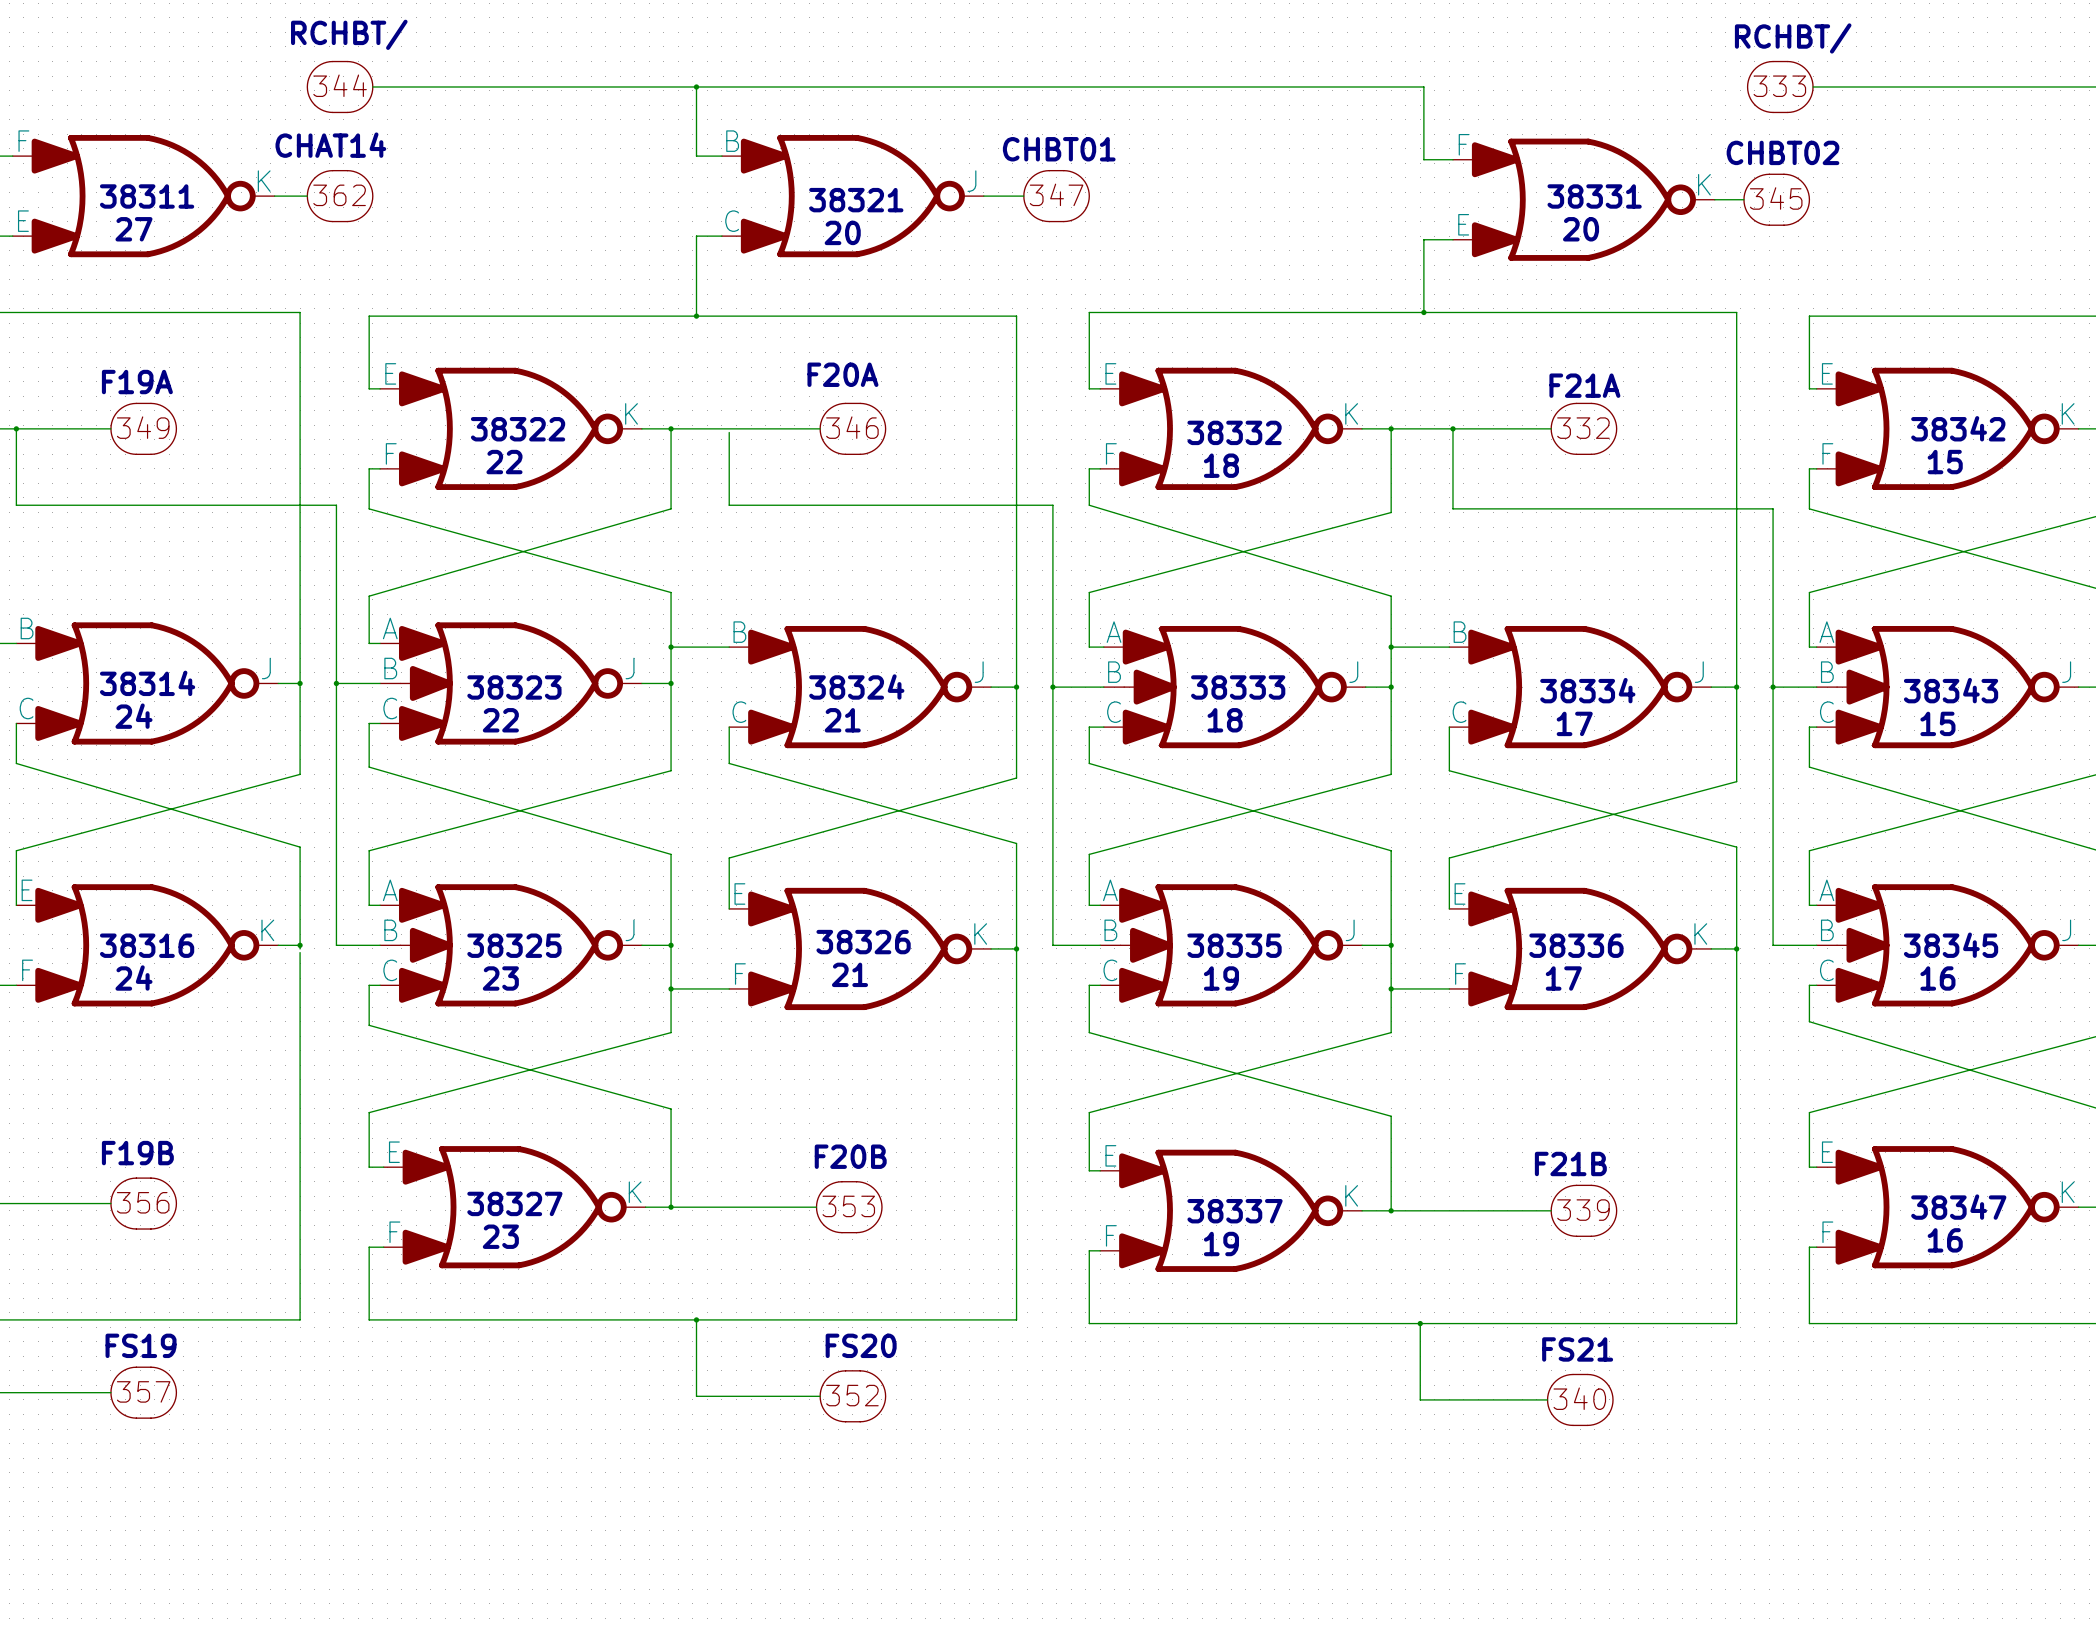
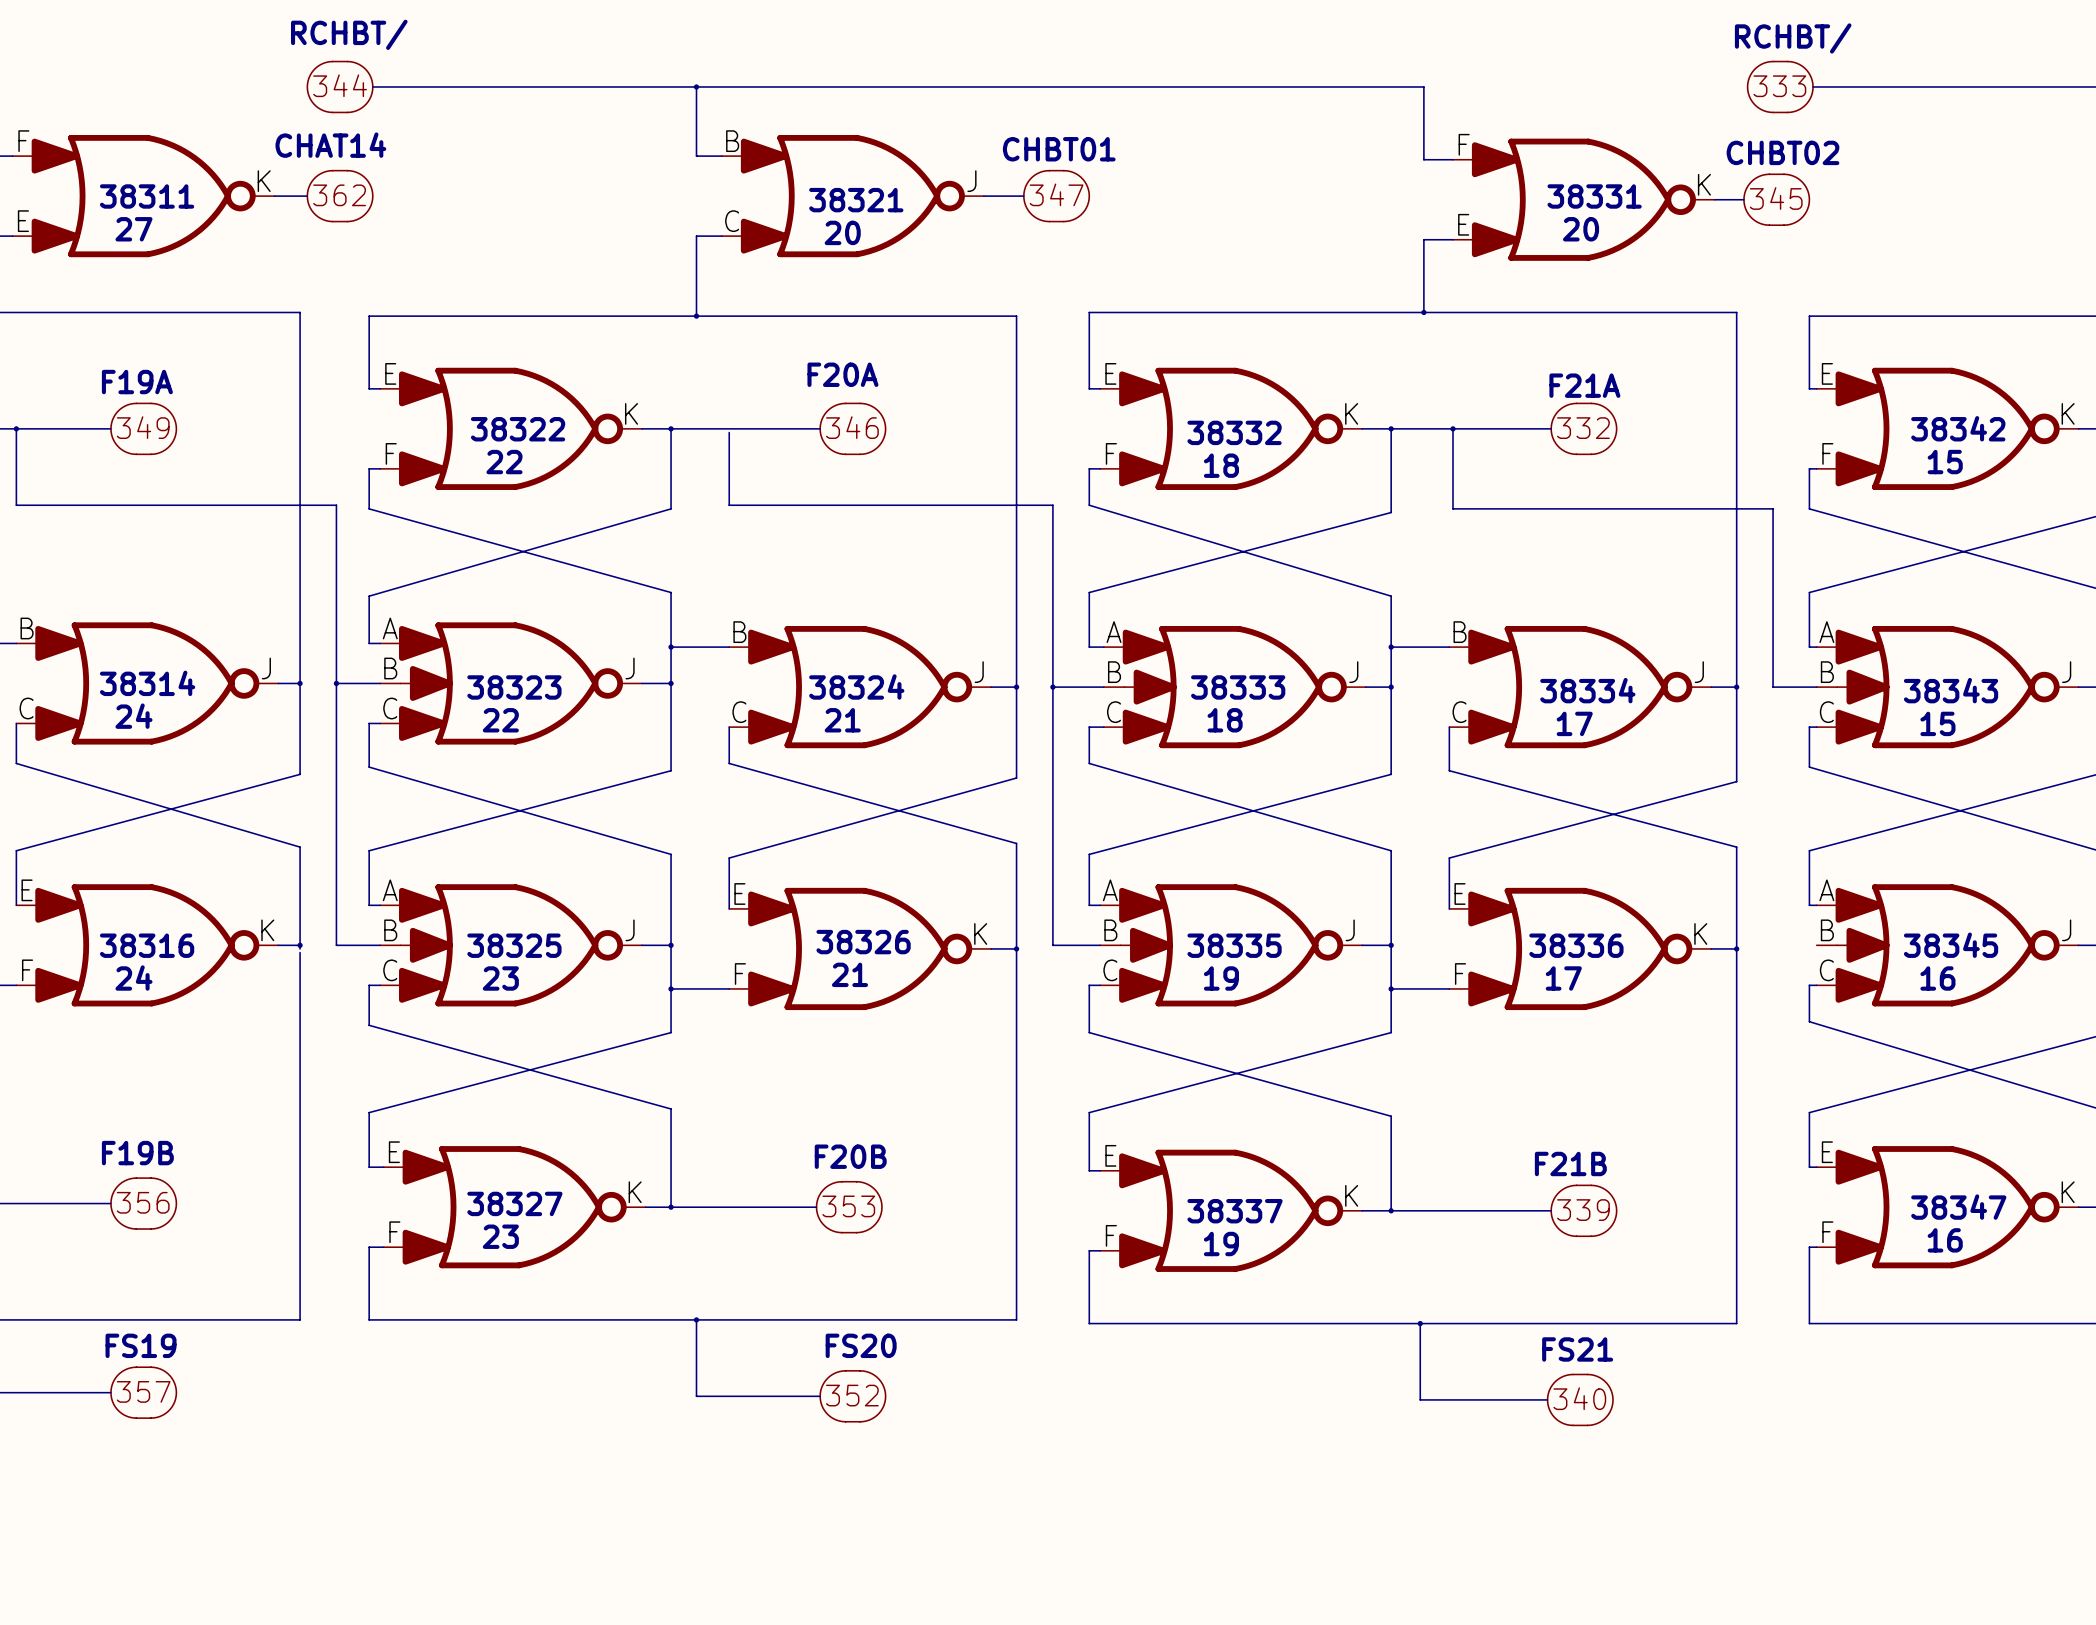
wire: (1773, 687) (1773, 945) (1816, 945) -> none
junction: (1773, 687) -> none

